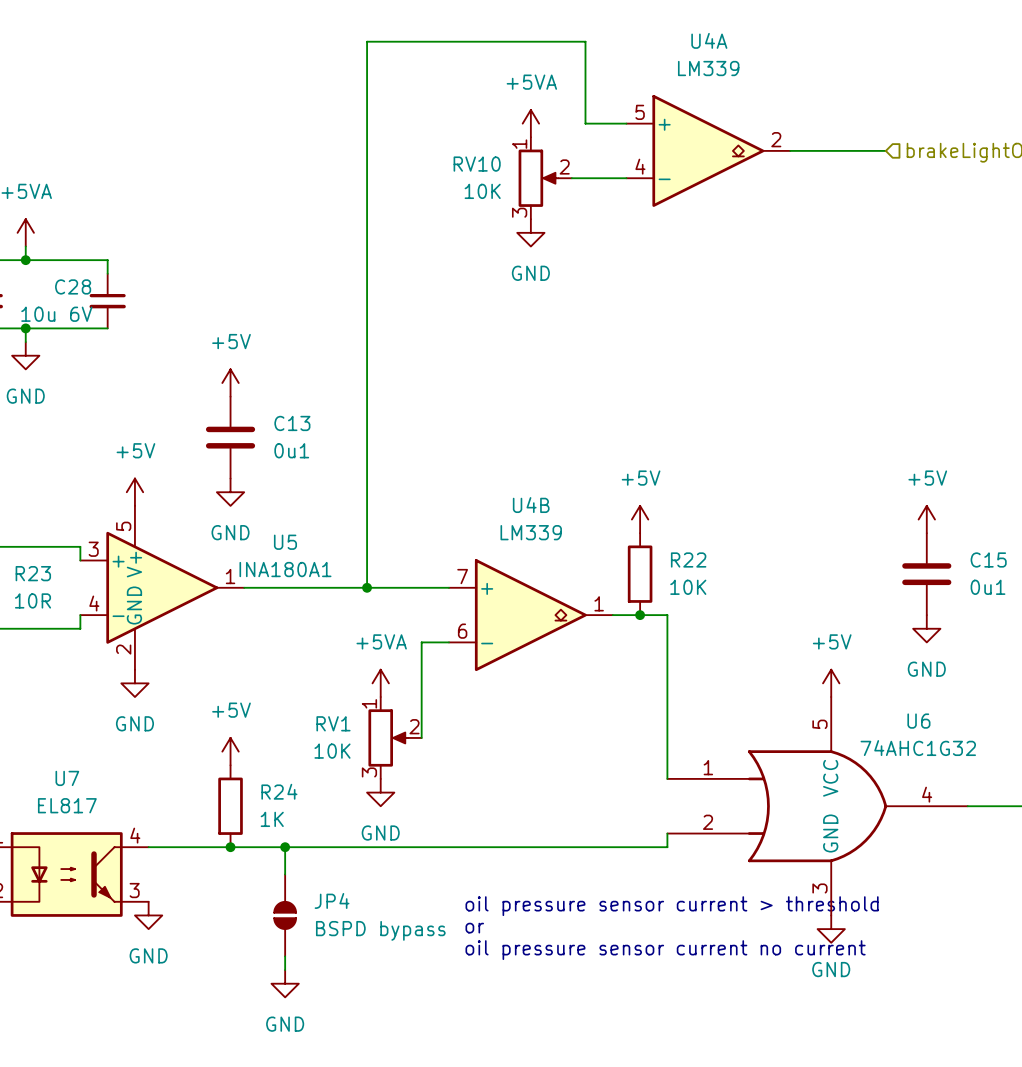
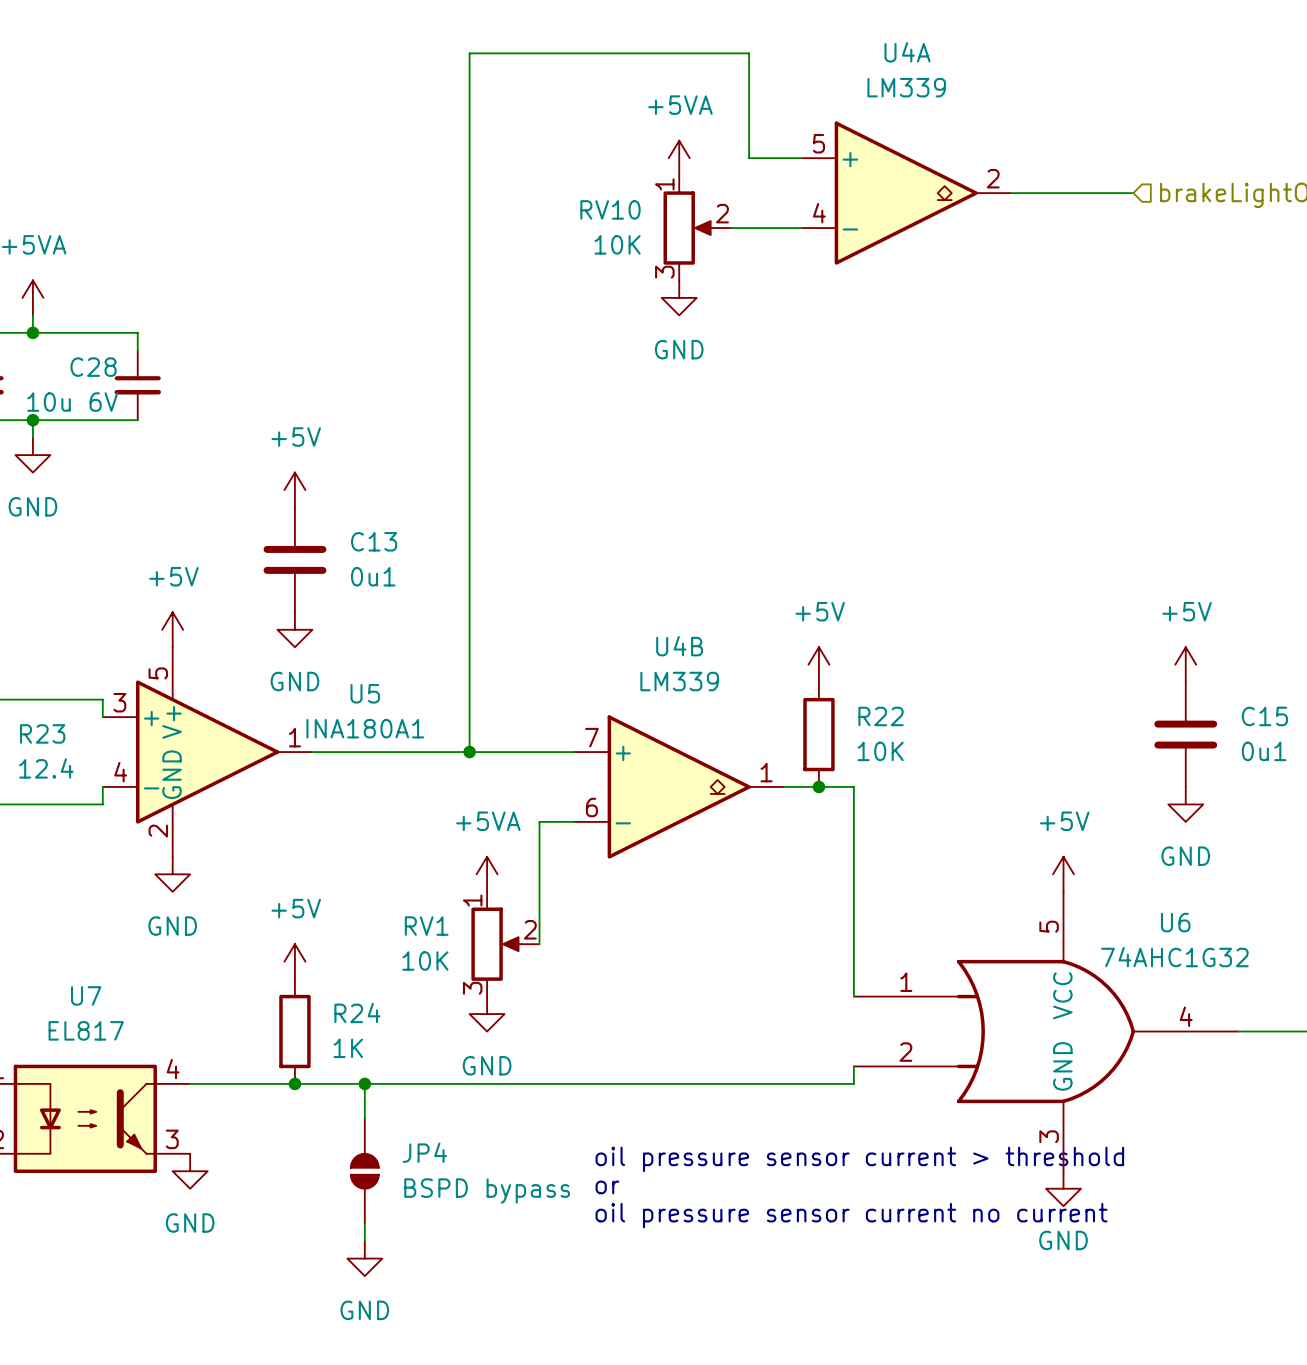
R23 value: 10R (33, 600) -> 12.4 (46, 768)

